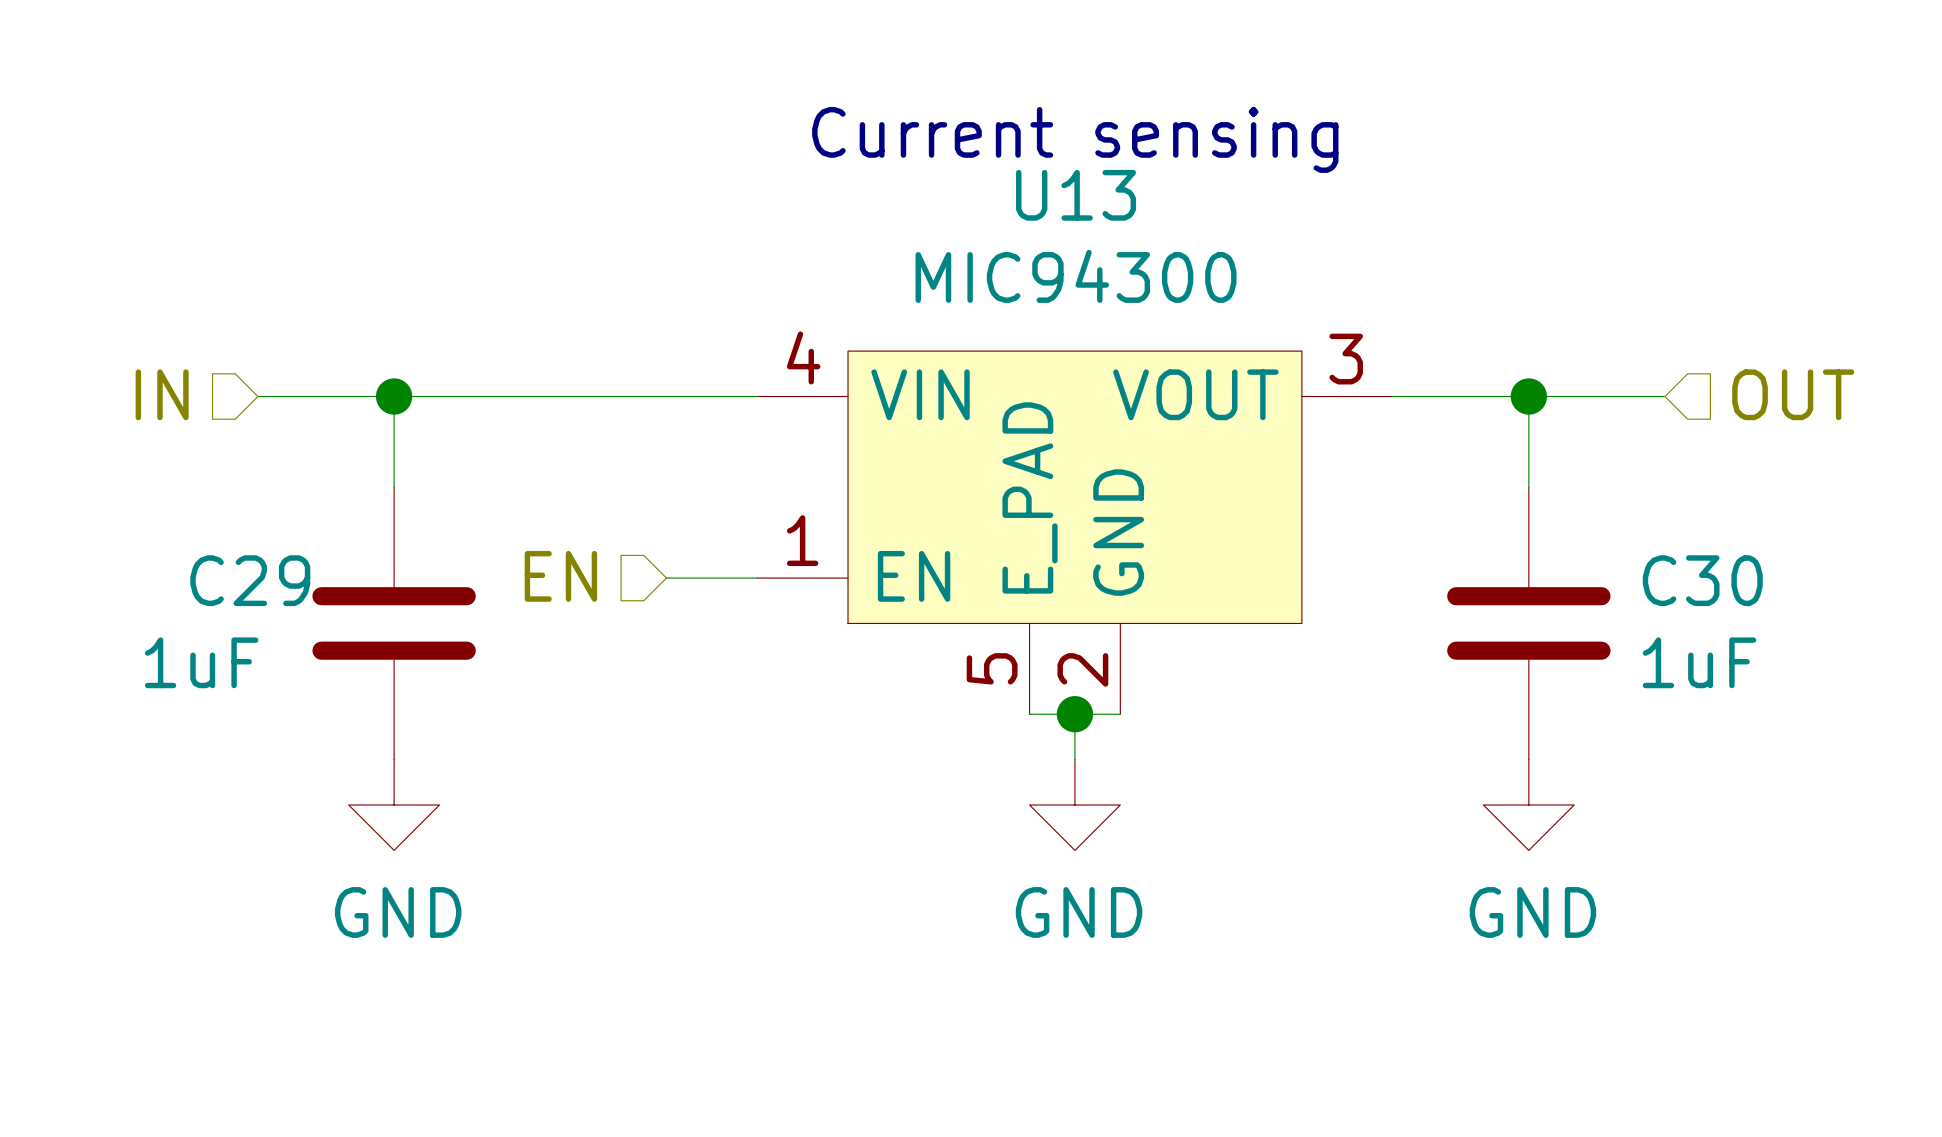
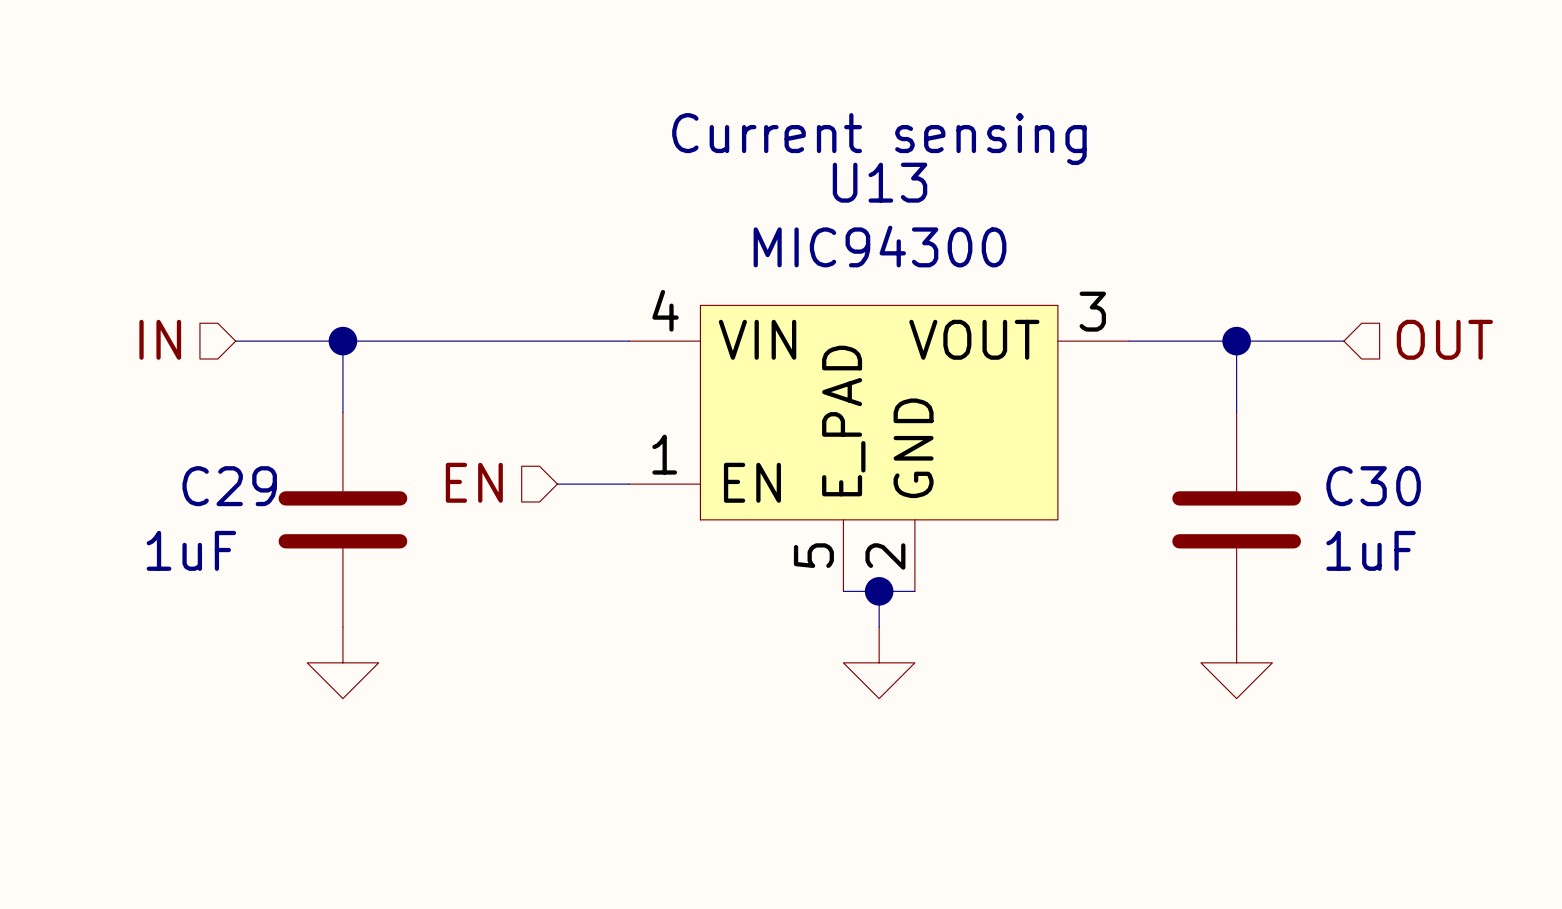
power symbol text: GND (398, 912) -> none
power symbol text: GND (1079, 912) -> none
power symbol text: GND (1532, 912) -> none

